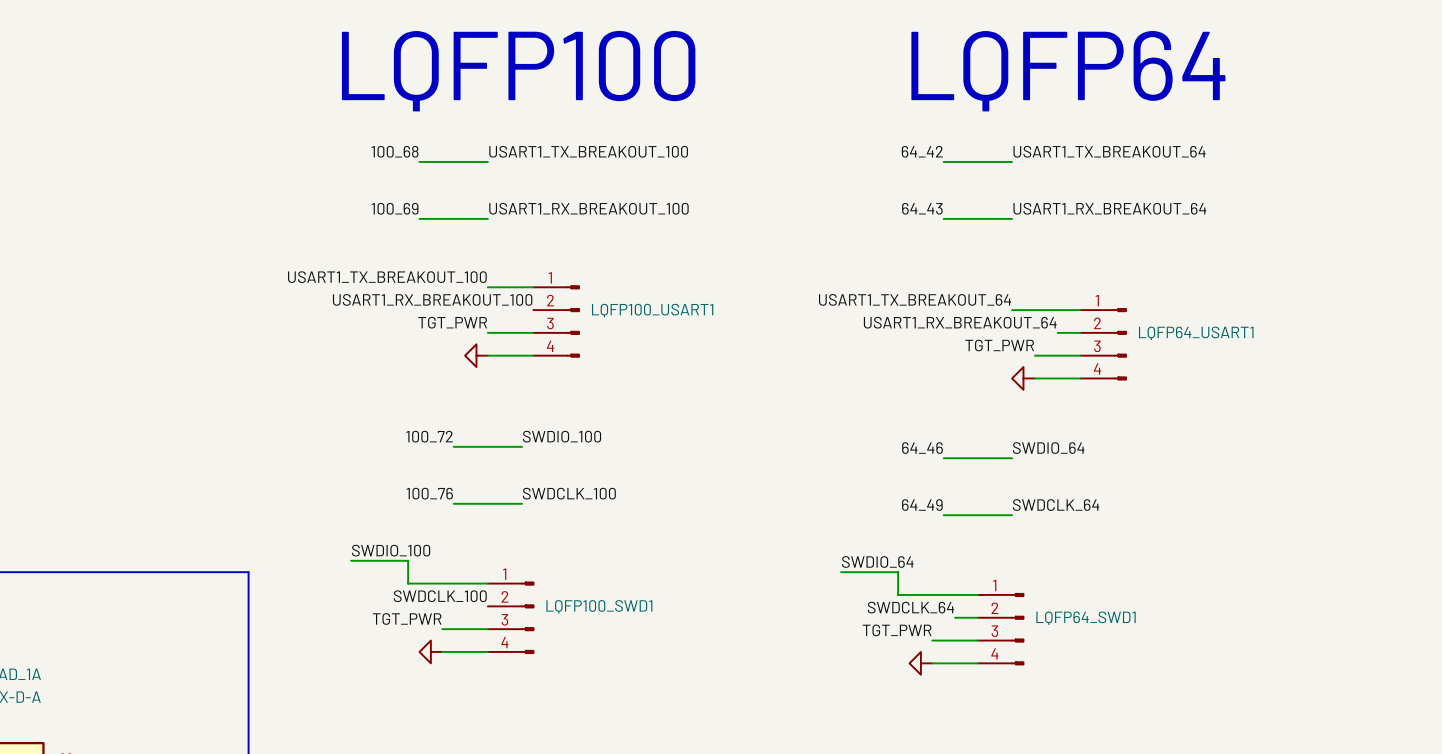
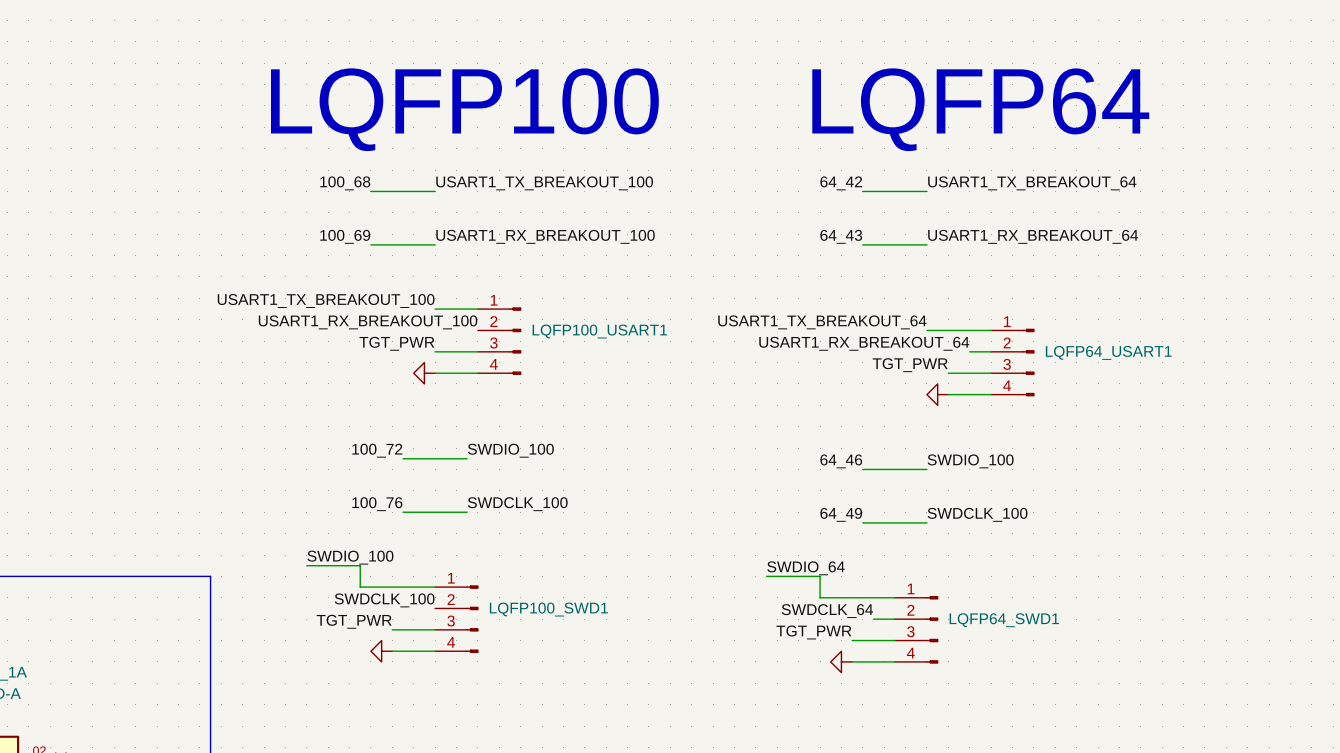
label: SWDIO_64 (1048, 448) -> SWDIO_100 (970, 461)
label: SWDCLK_64 (1056, 505) -> SWDCLK_100 (977, 514)

